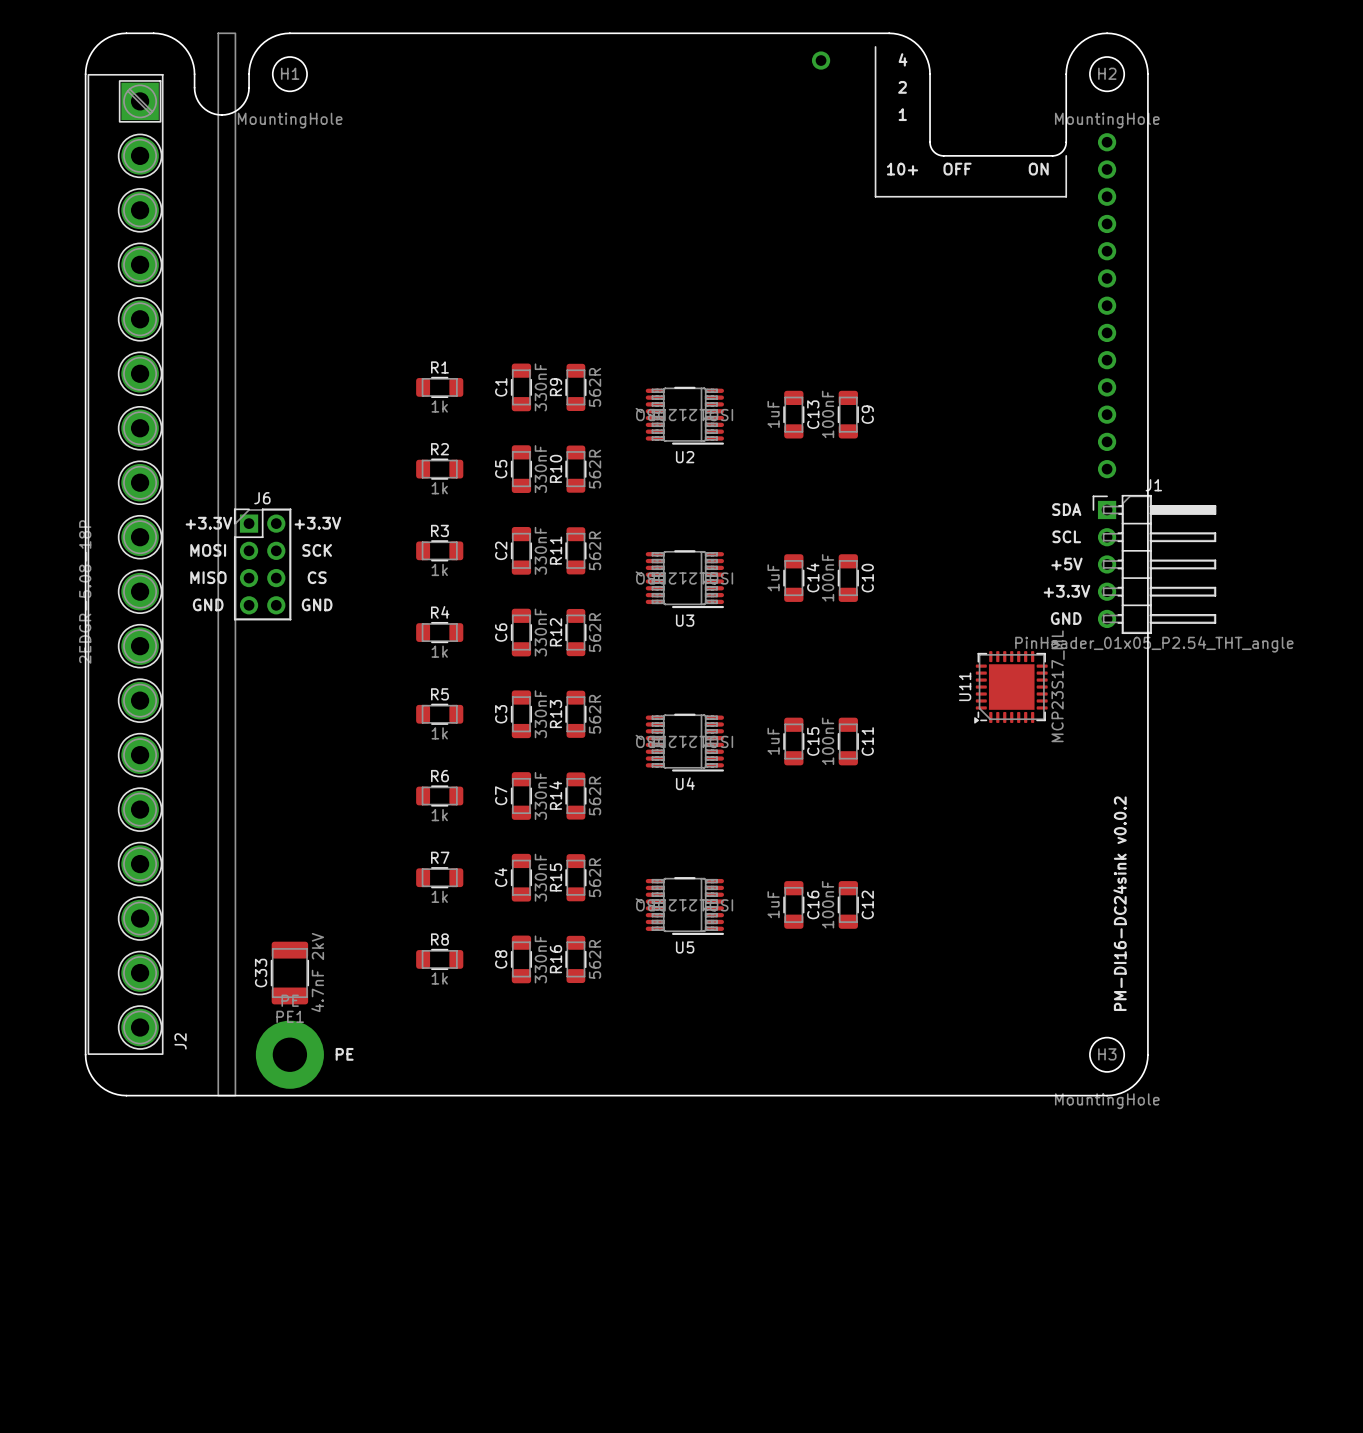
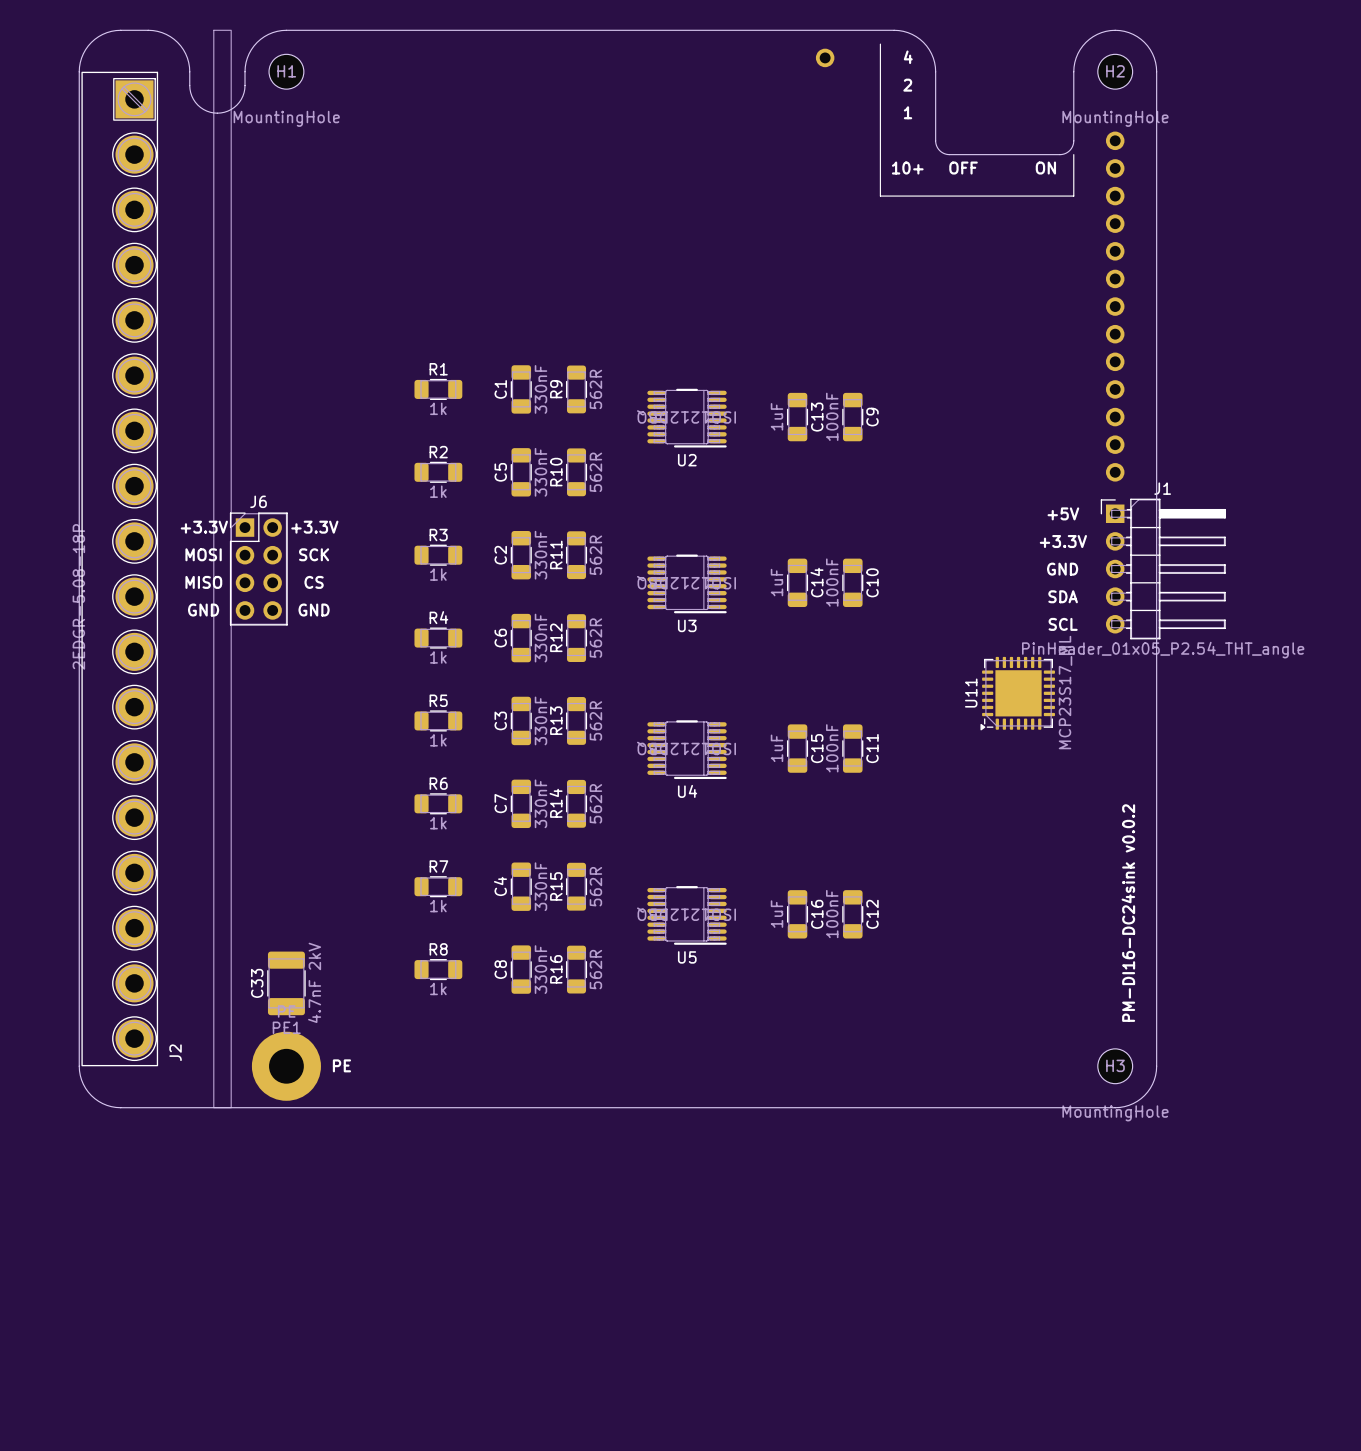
text position: SDA (1066, 509) -> SDA (1063, 596)
text position: SCL (1066, 536) -> SCL (1063, 624)
text position: +5V (1066, 564) -> +5V (1063, 513)
text position: +3.3V (1066, 591) -> +3.3V (1063, 541)
text position: GND (1066, 618) -> GND (1062, 569)

